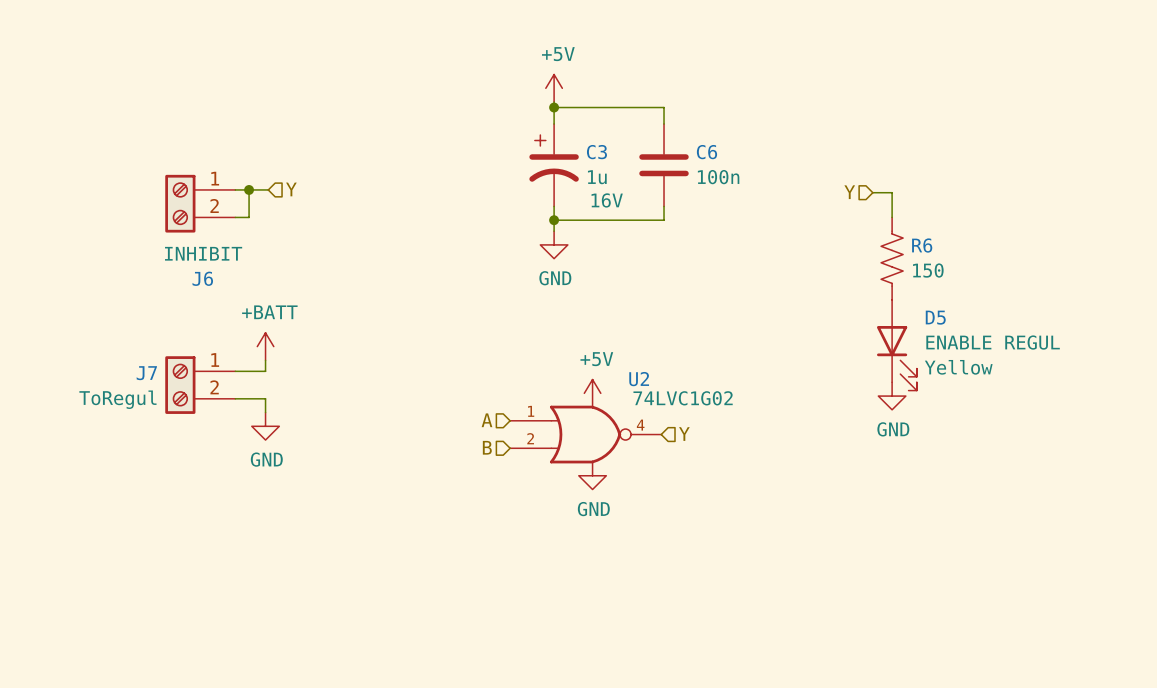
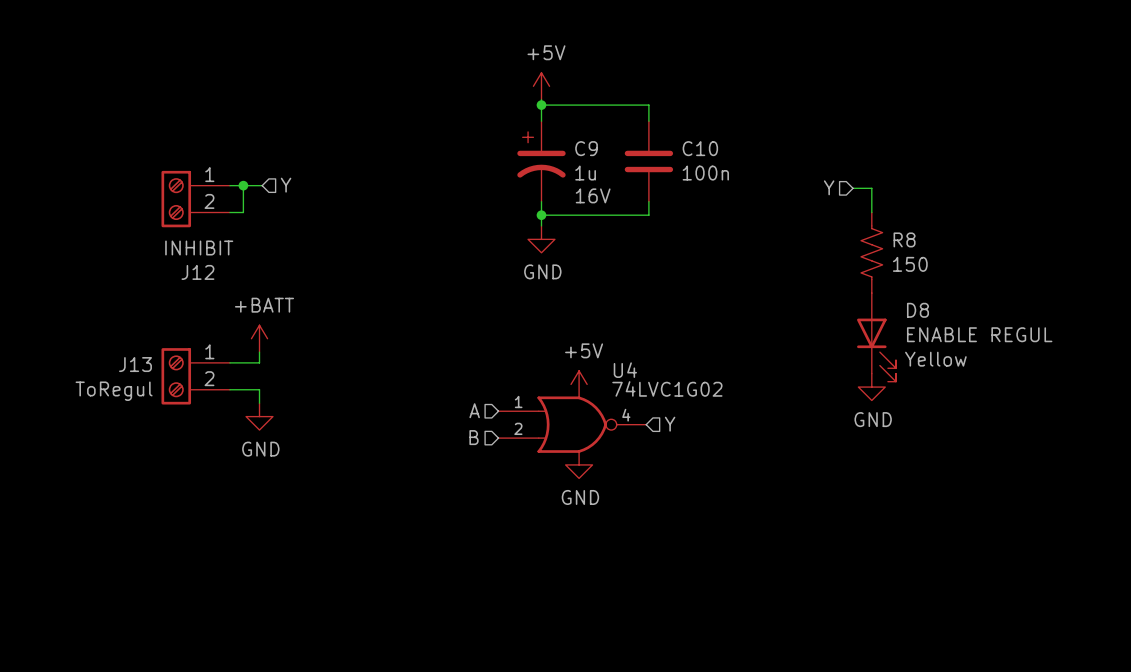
C3 name: C3 (596, 152) -> C9 (586, 148)
C6 name: C6 (706, 152) -> C10 (700, 148)
R6 name: R6 (922, 245) -> R8 (904, 239)
J6 name: J6 (202, 278) -> J12 (197, 272)
D5 name: D5 (935, 317) -> D8 (917, 310)
J7 name: J7 (146, 373) -> J13 (135, 364)
U2 name: U2 (639, 379) -> U4 (625, 370)

